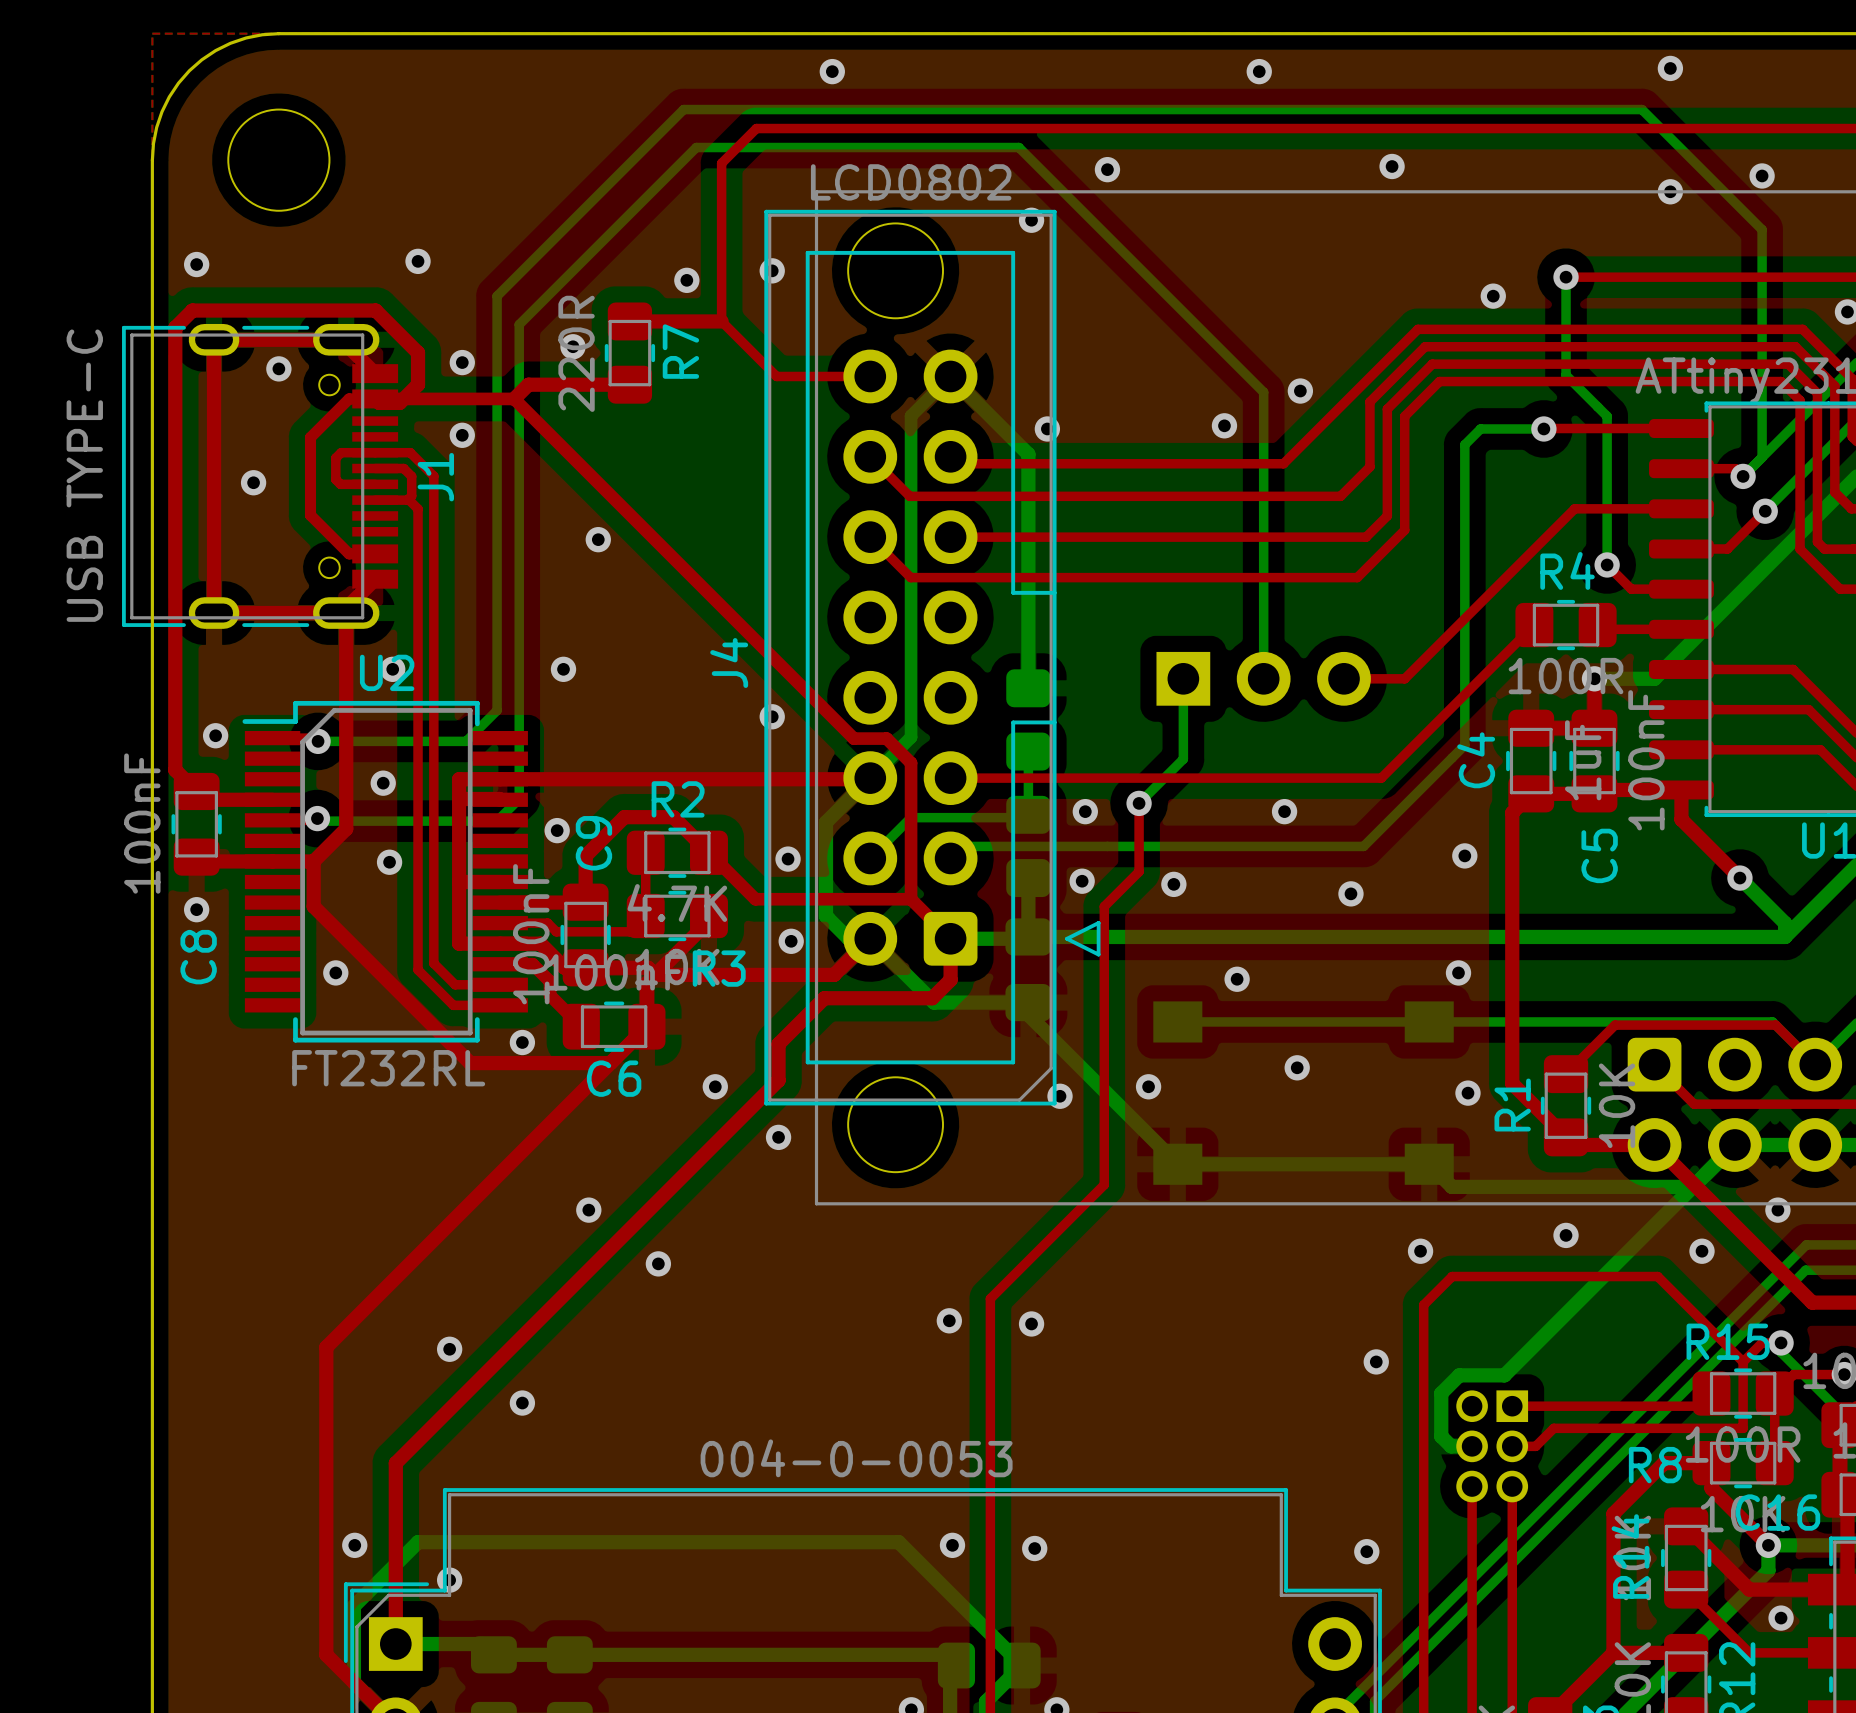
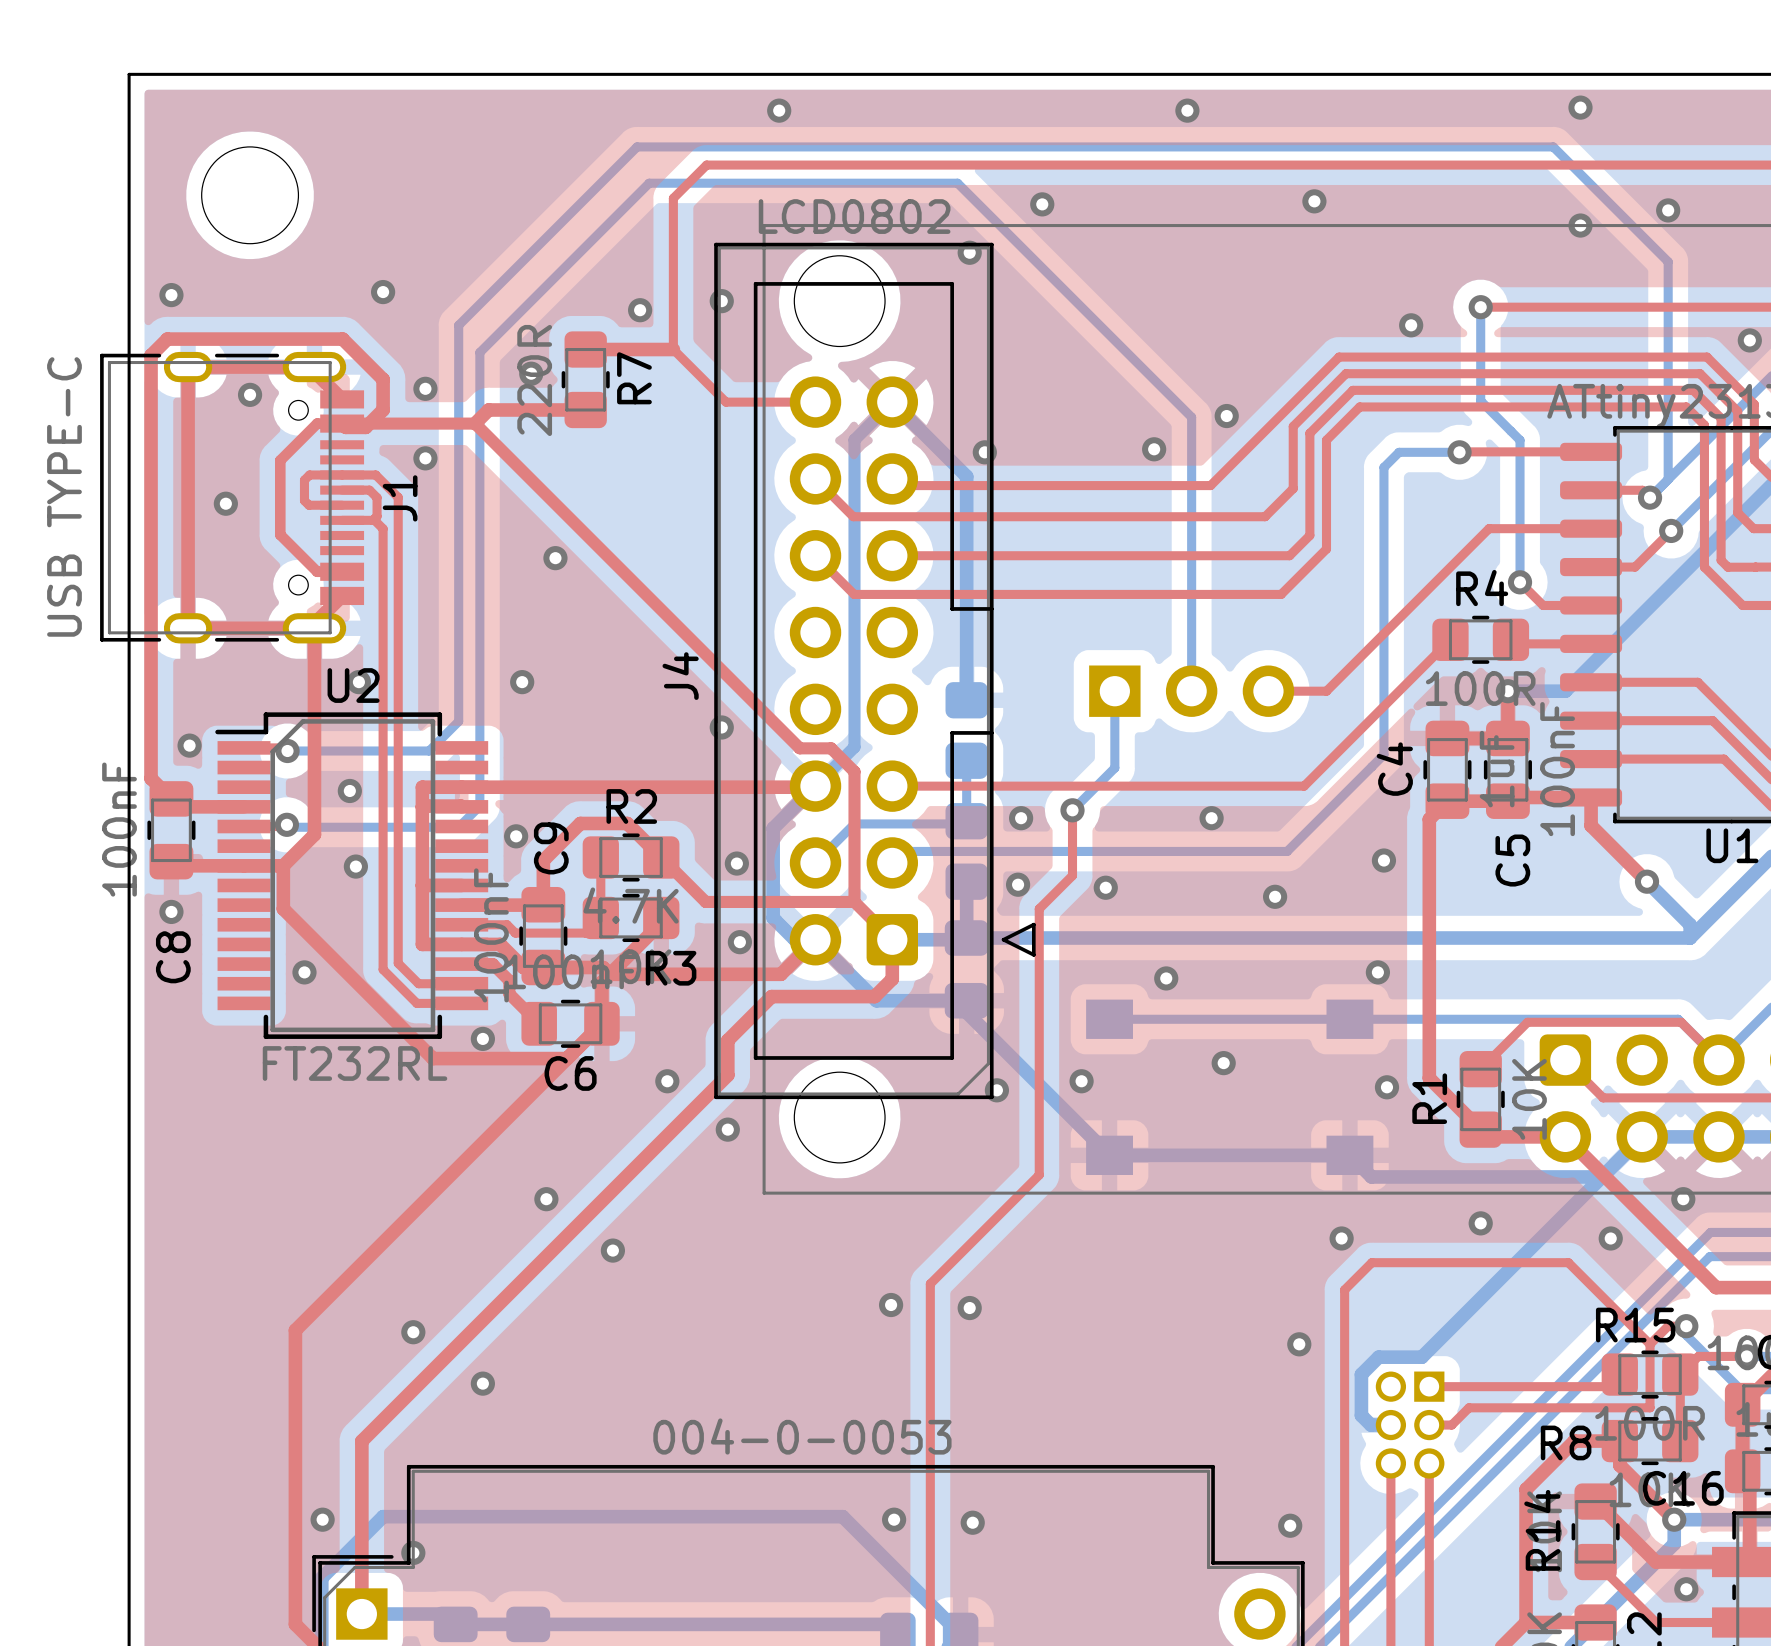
board edge: (278, 33) (262, 34) (230, 43) (201, 59) (189, 70) (169, 96) (162, 111) (153, 143) (152, 160) -> (250, 74) (129, 74) (129, 195)

